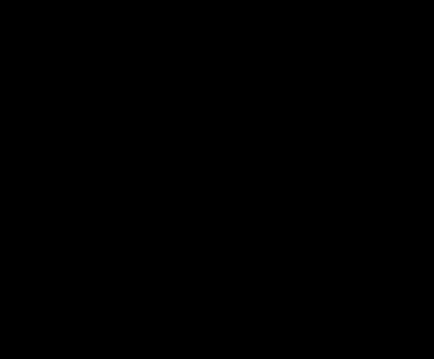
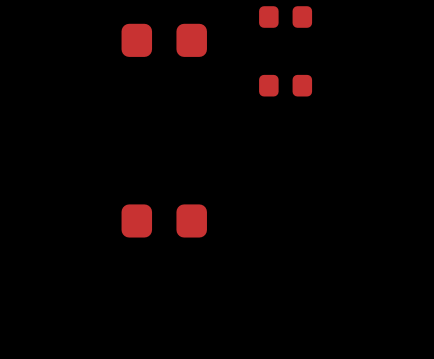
part: none -> (285, 17)
part: none -> (164, 40)
part: none -> (285, 85)
part: none -> (164, 220)

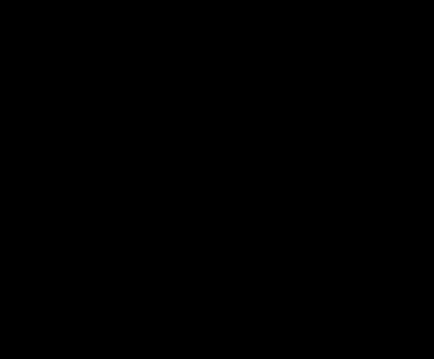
part: (285, 17) -> none
part: (164, 40) -> none
part: (285, 85) -> none
part: (164, 220) -> none

